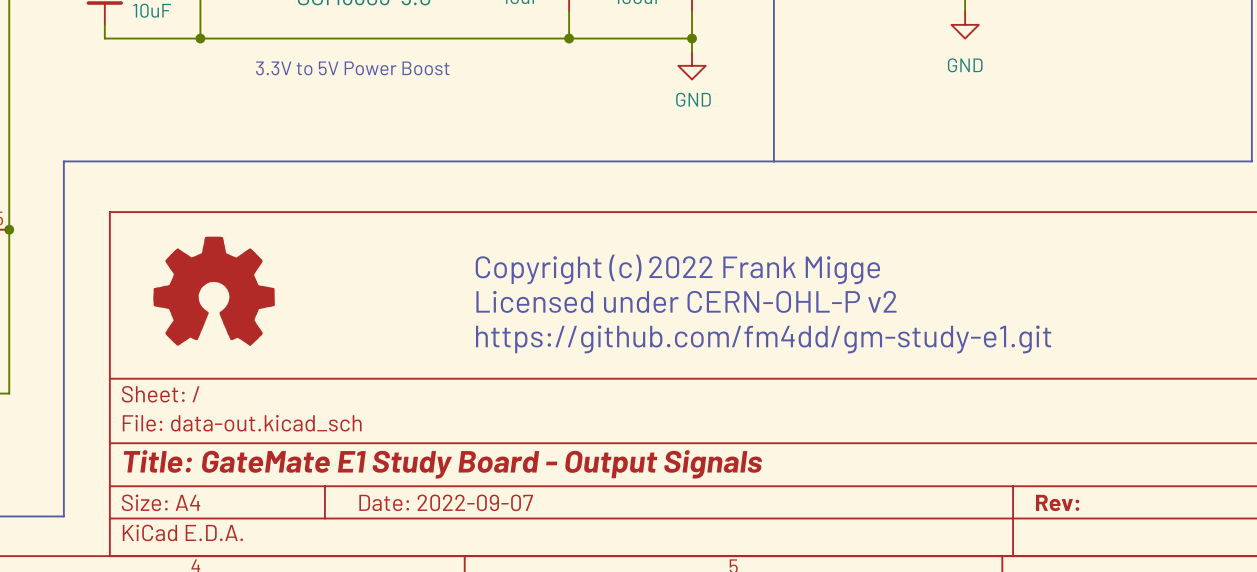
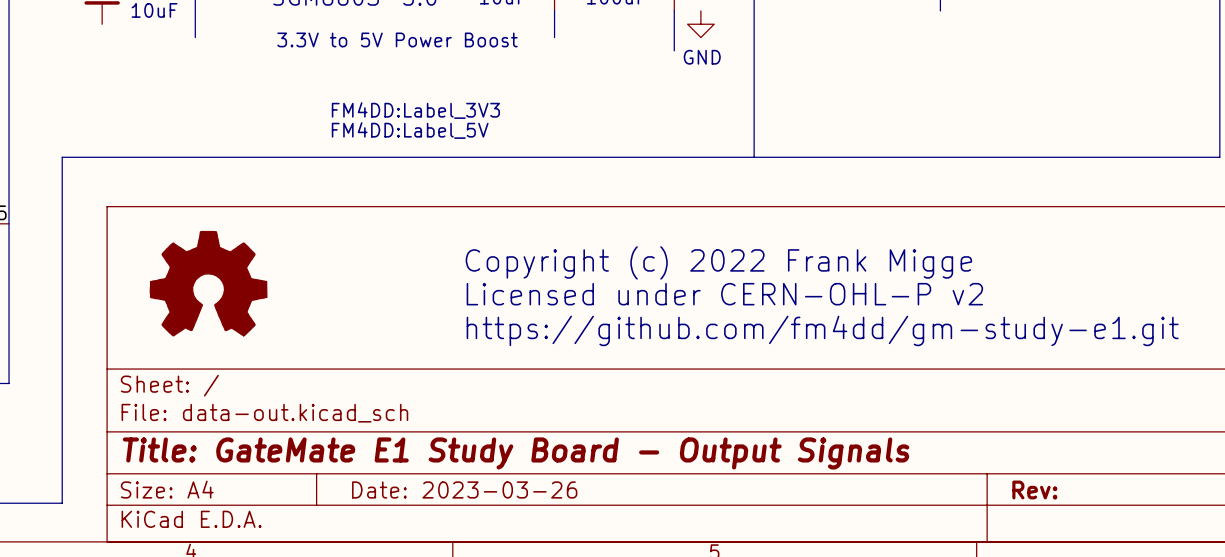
wire: (104, 24) (104, 38) (692, 38) -> none
power symbol: GND (965, 24) -> none
junction: (200, 38) -> none
junction: (569, 38) -> none
junction: (692, 38) -> none
power symbol position: GND (692, 65) -> GND (700, 24)
text position: 3.3V to 5V Power Boost (352, 68) -> 3.3V to 5V Power Boost (397, 39)
part: none -> (415, 110)
part: none -> (410, 130)
junction: (9, 229) -> none
title block: Date: 2022-09-07 (446, 502) -> Date: 2023-03-26 (464, 489)

